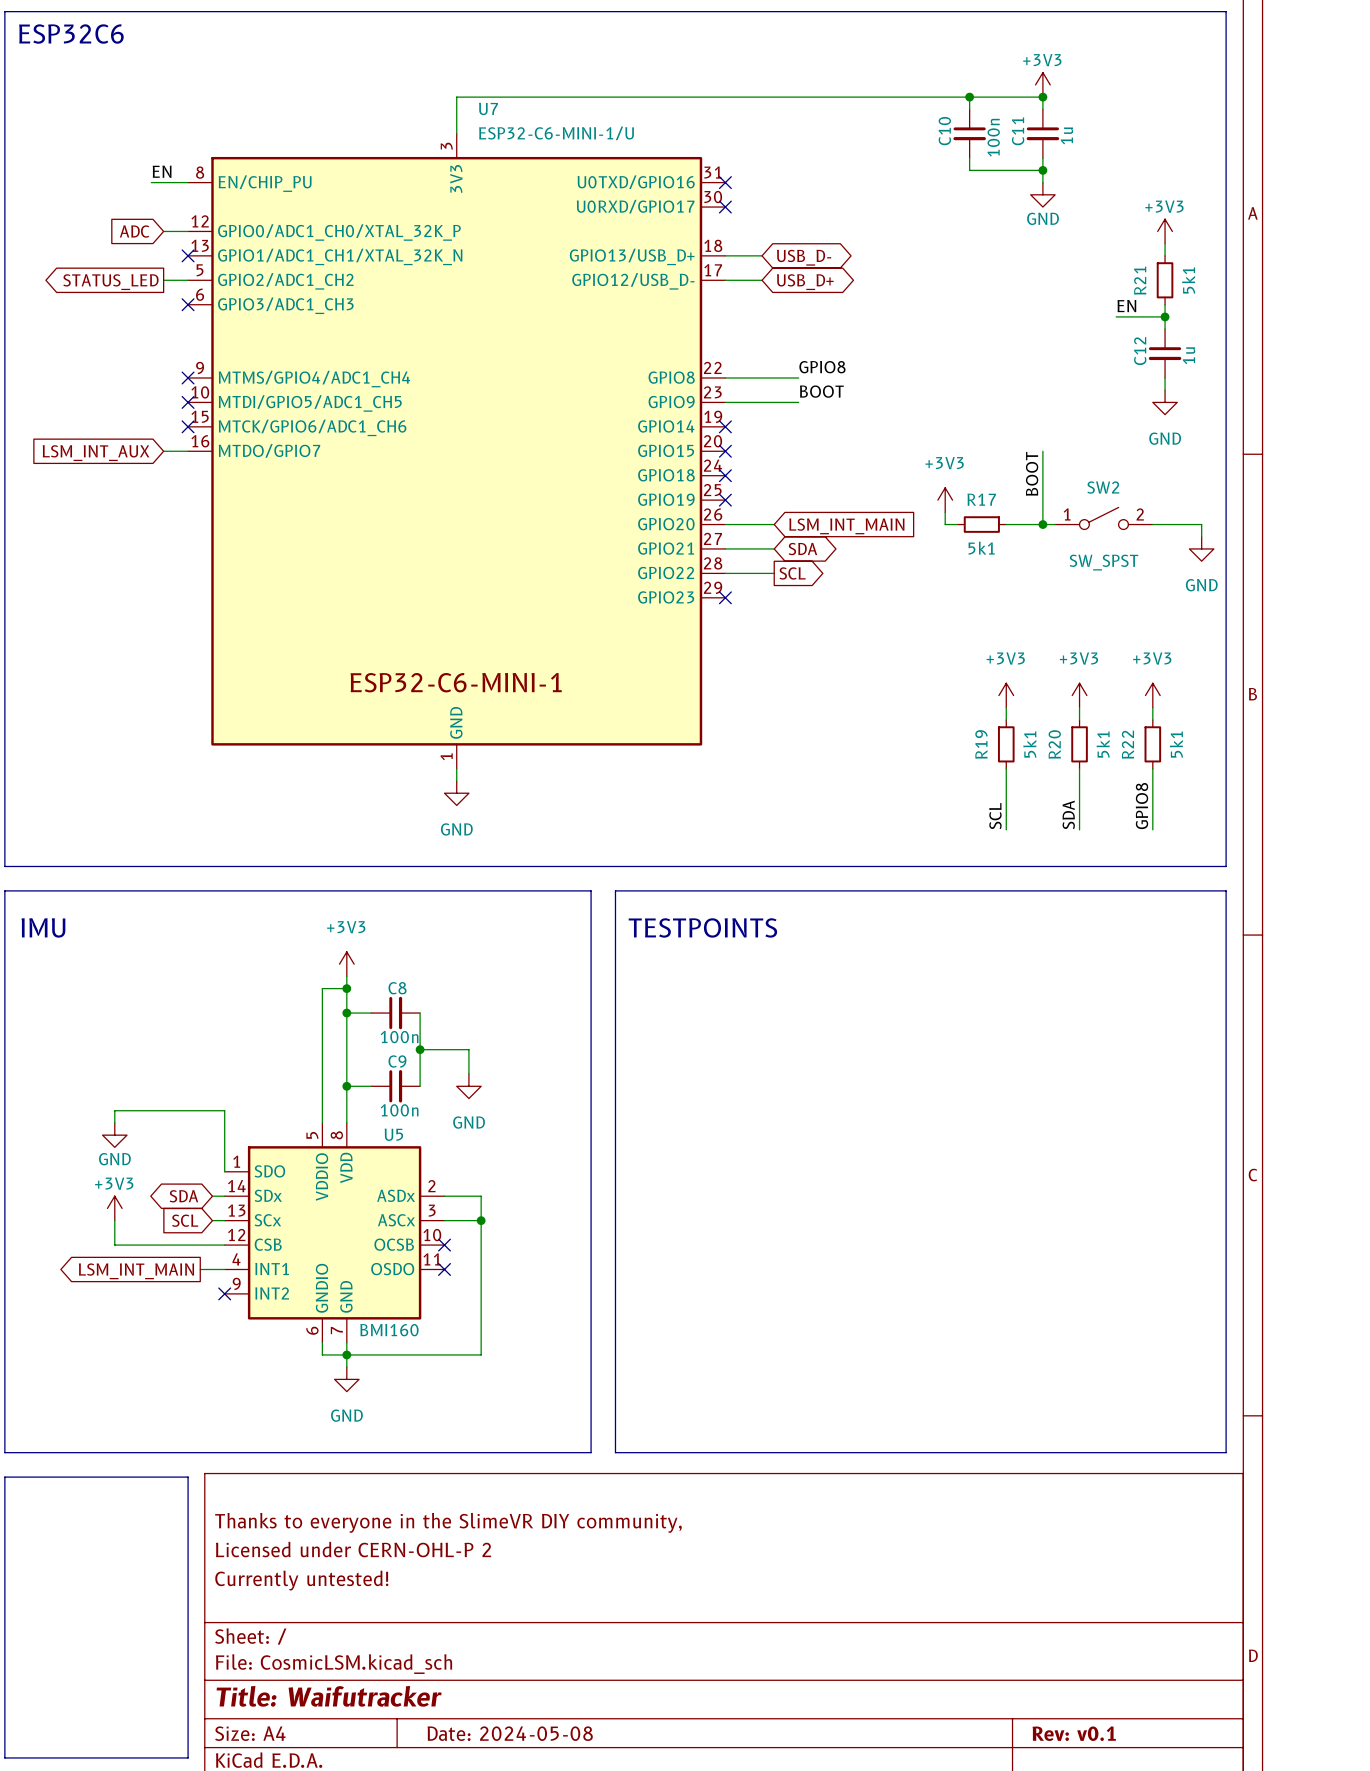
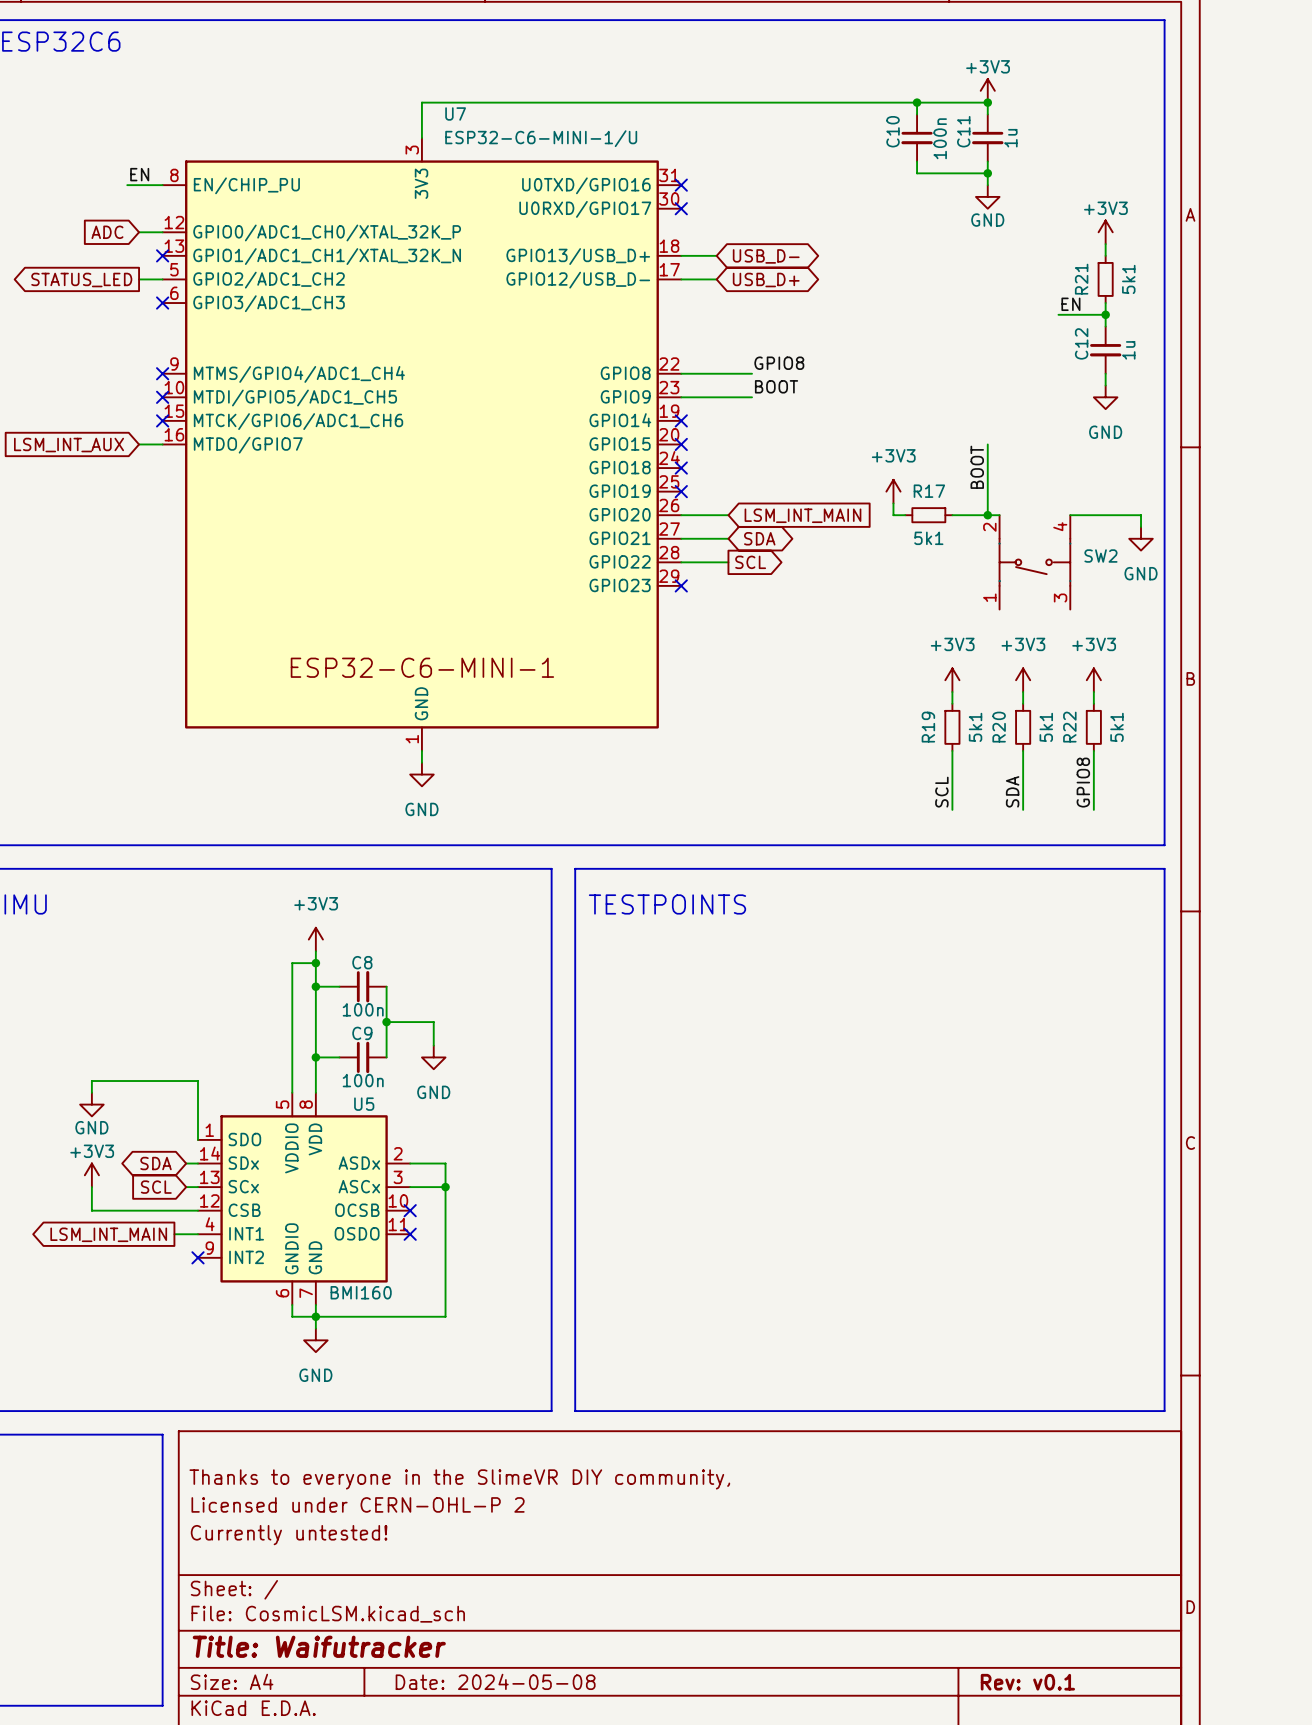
SW2 name position: SW2 (1103, 487) -> SW2 (1100, 556)
SW2 symbol: [1055, 507, 1153, 530] -> [999, 515, 1071, 610]
SW2 value: SW_SPST (1103, 562) -> none

